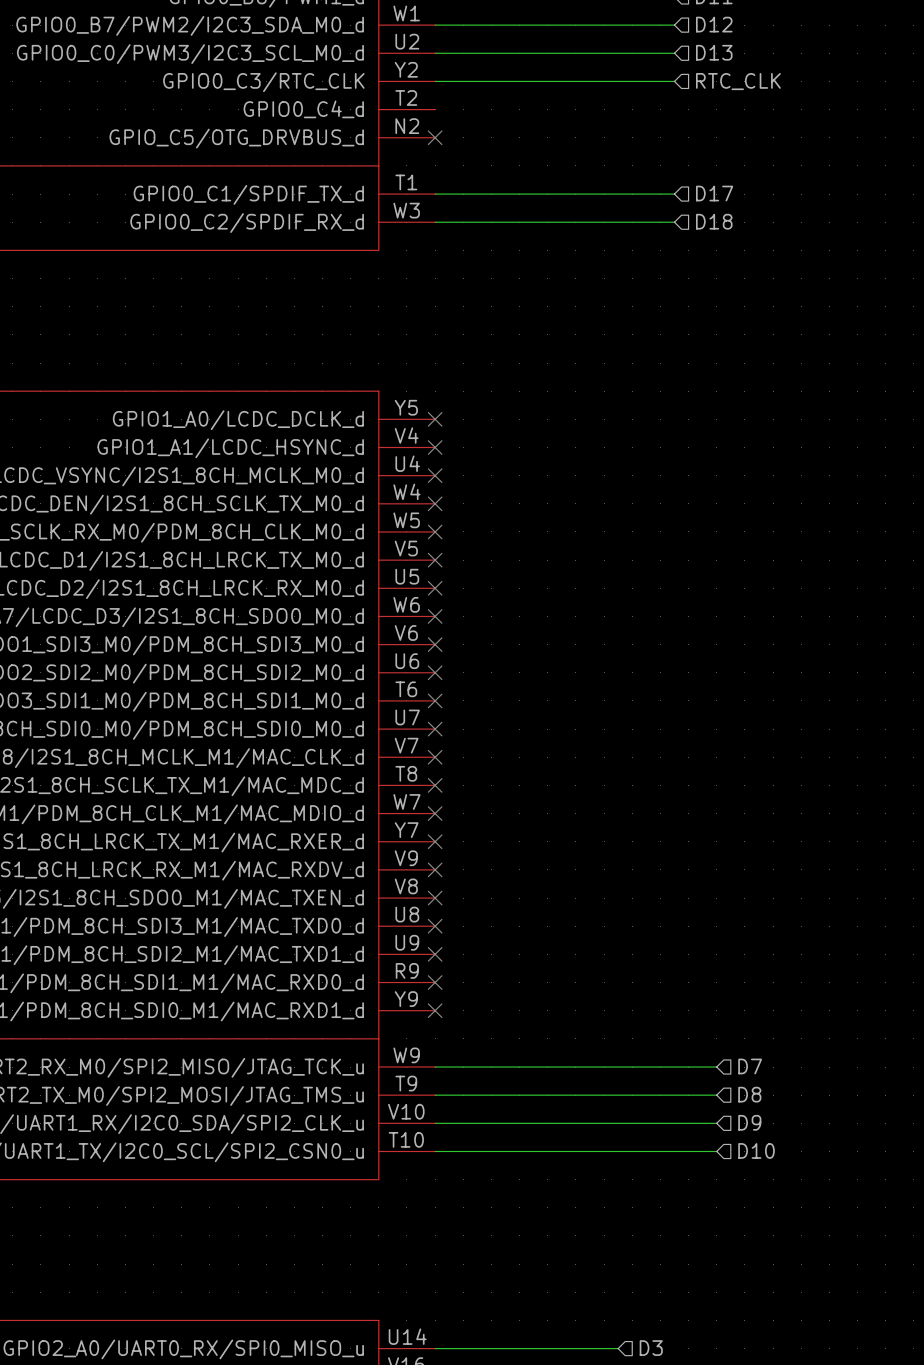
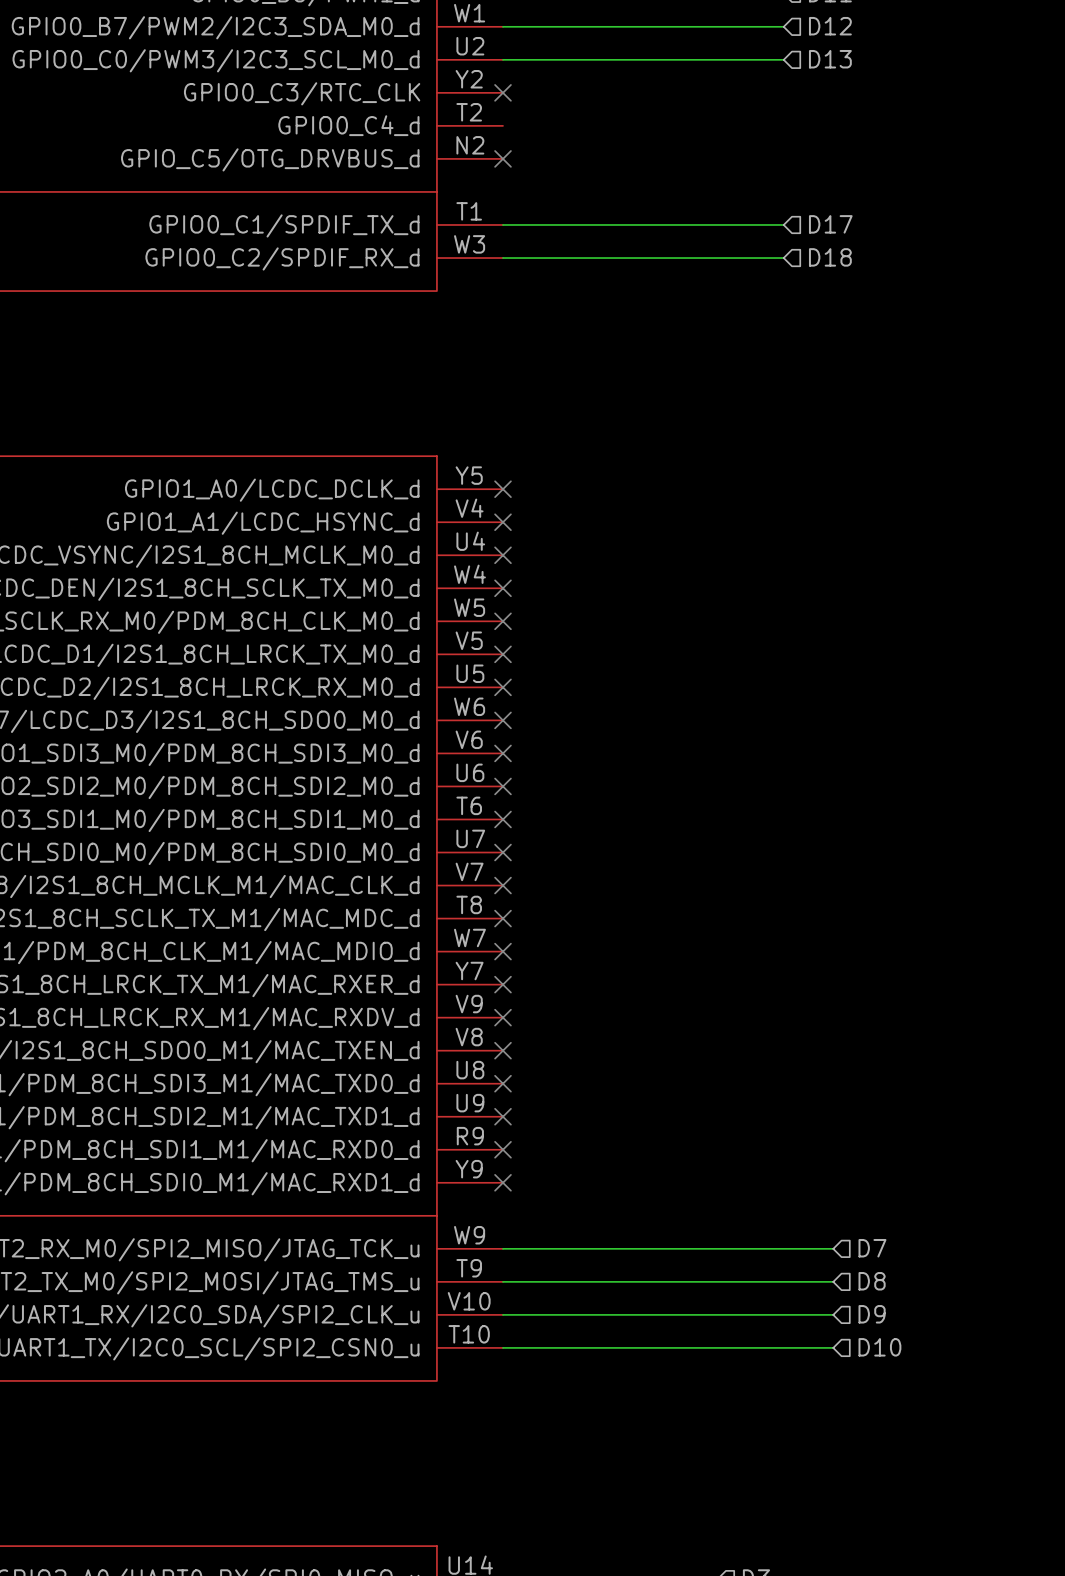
wire: (435, 81) (674, 81) -> none
no-connect mark: none -> (503, 92)
hierarchical label: RTC_CLK (738, 81) -> none

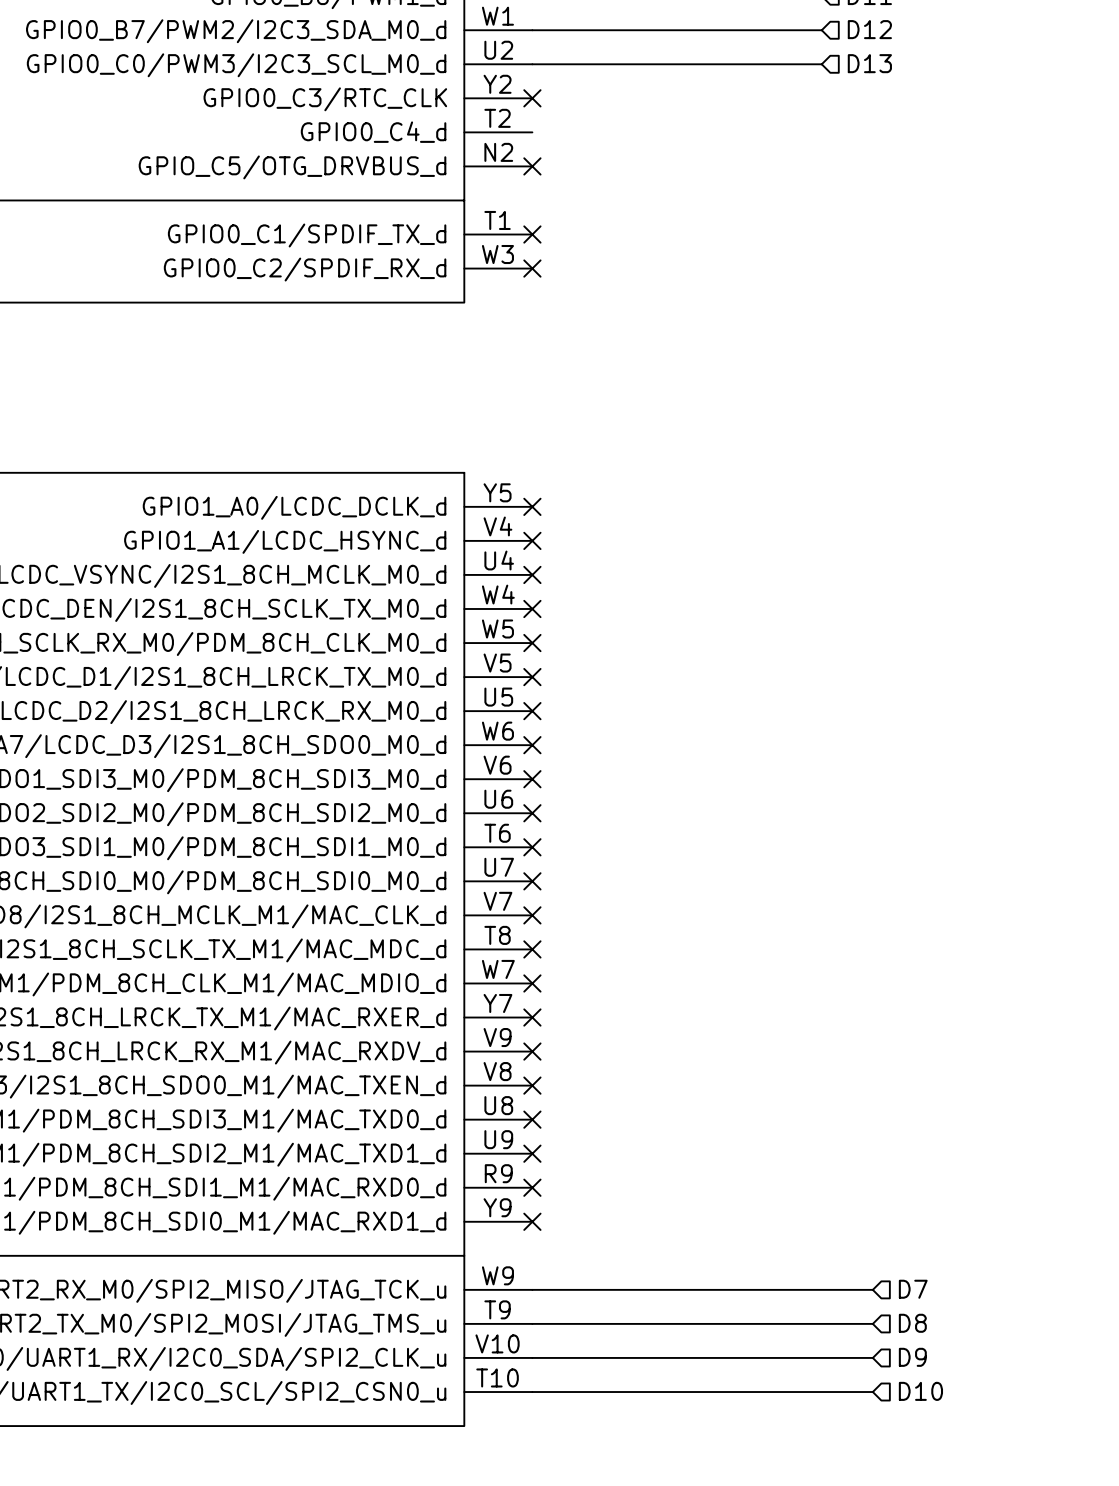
wire: (503, 224) (783, 224) -> none
no-connect mark: none -> (532, 234)
hierarchical label: D17 (830, 224) -> none
hierarchical label: D18 (830, 257) -> none
wire: (503, 258) (783, 258) -> none
no-connect mark: none -> (532, 268)

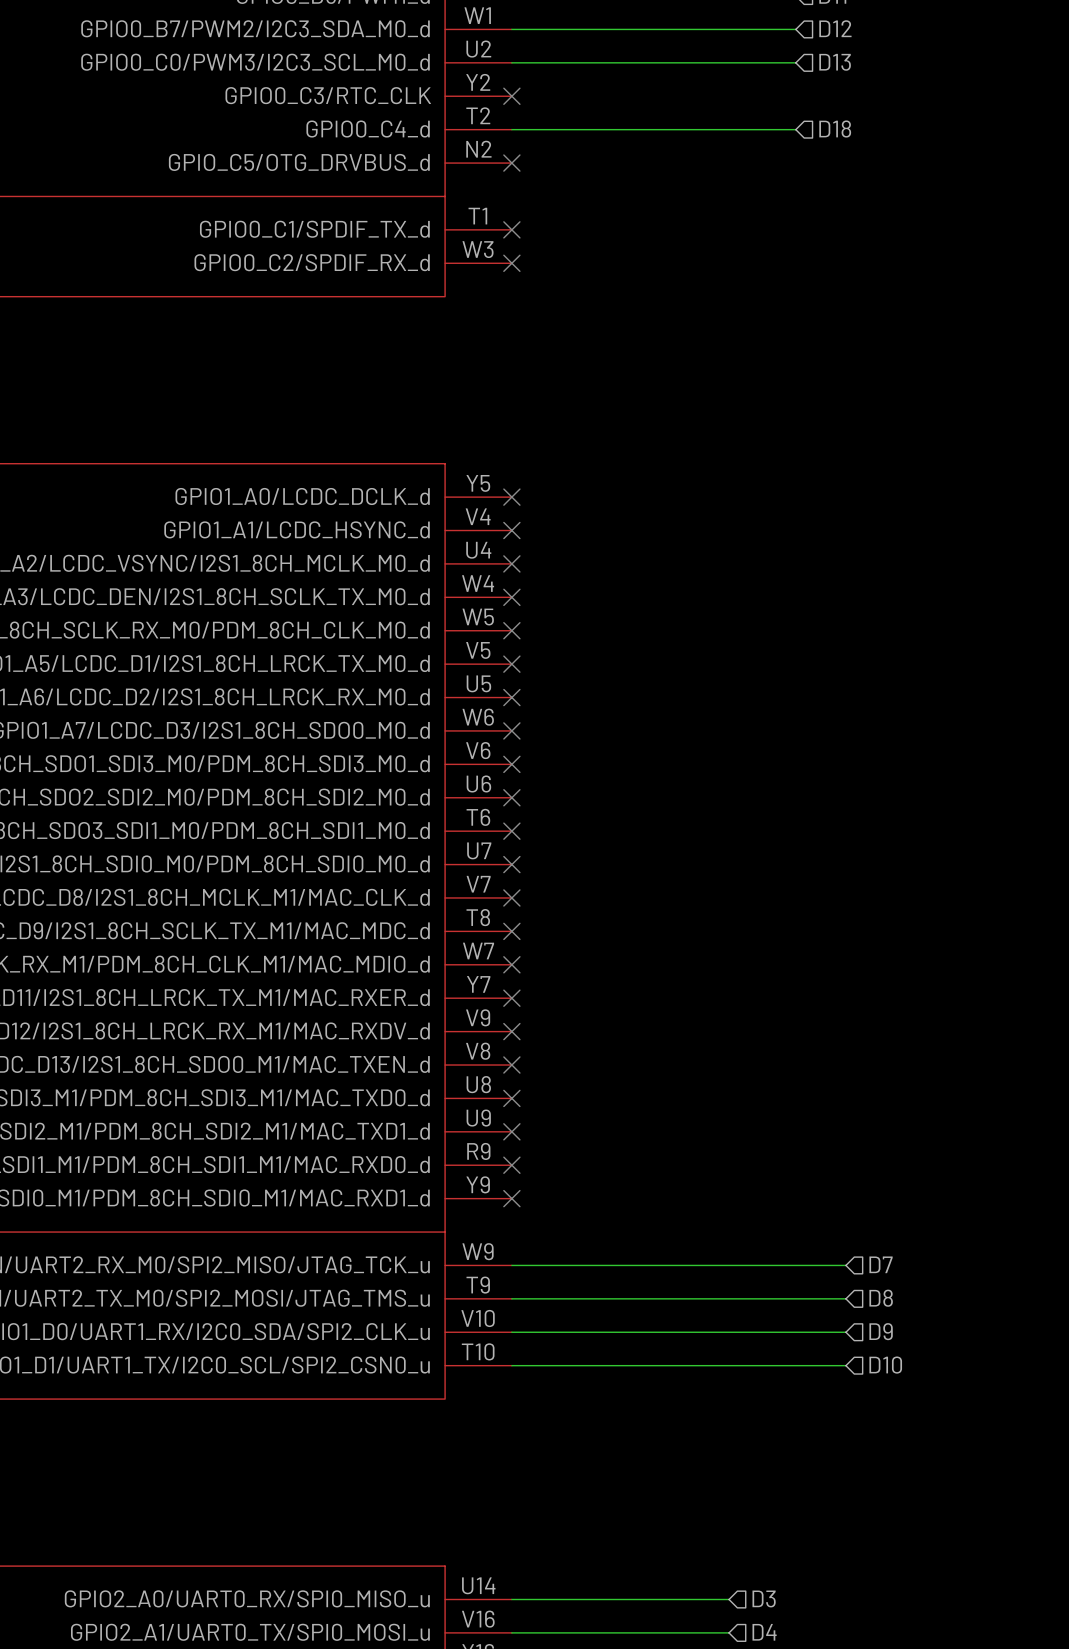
hierarchical label: none -> D18 (835, 129)
wire: none -> (511, 129) (795, 129)

